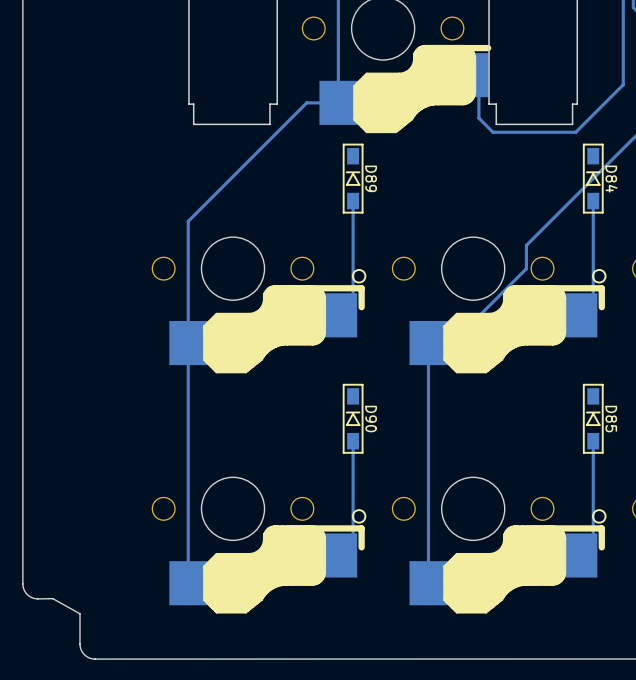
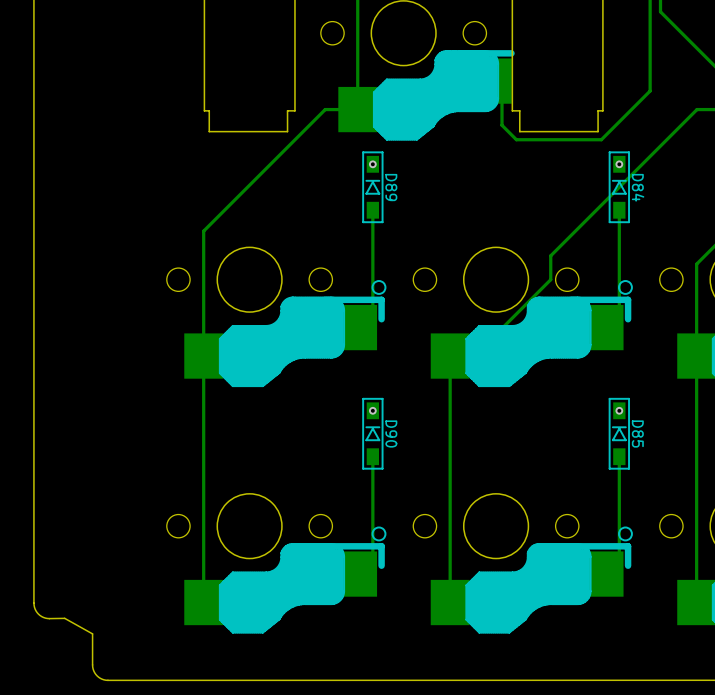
via: none -> (372, 164)
via: none -> (619, 164)
via: none -> (372, 410)
via: none -> (619, 410)

